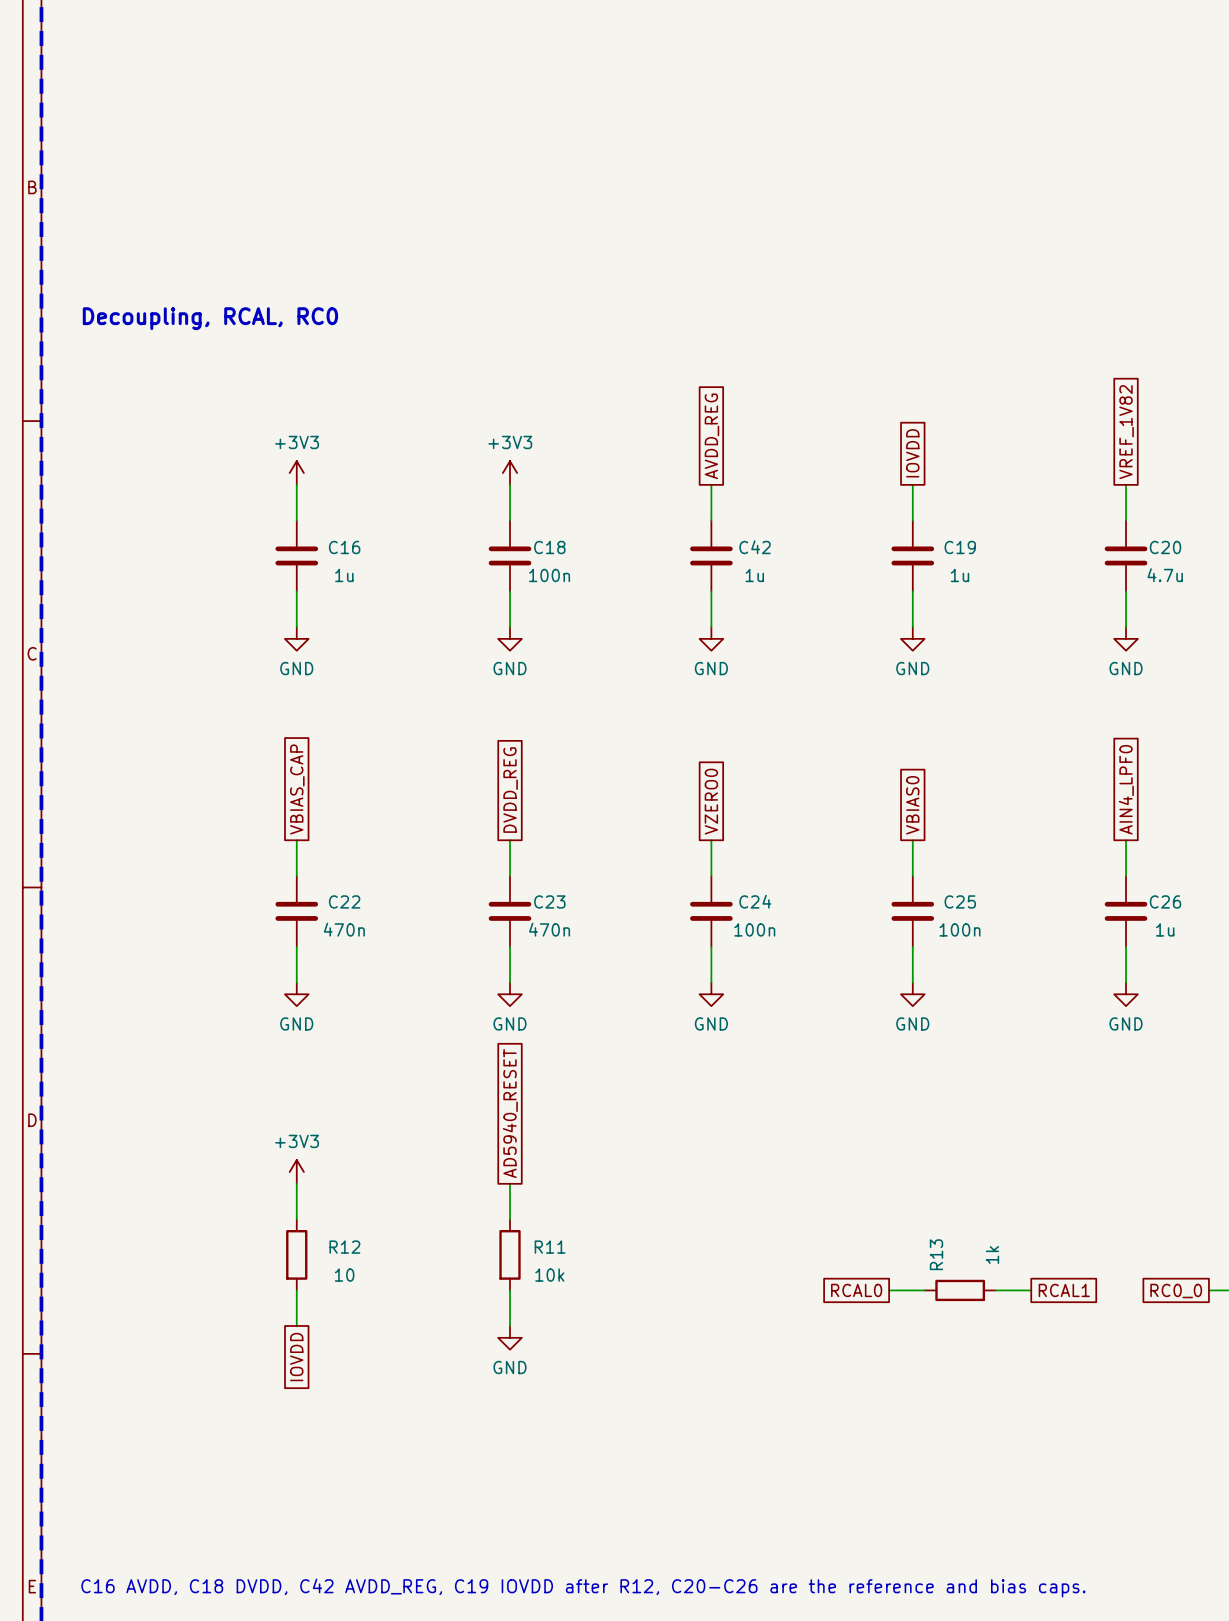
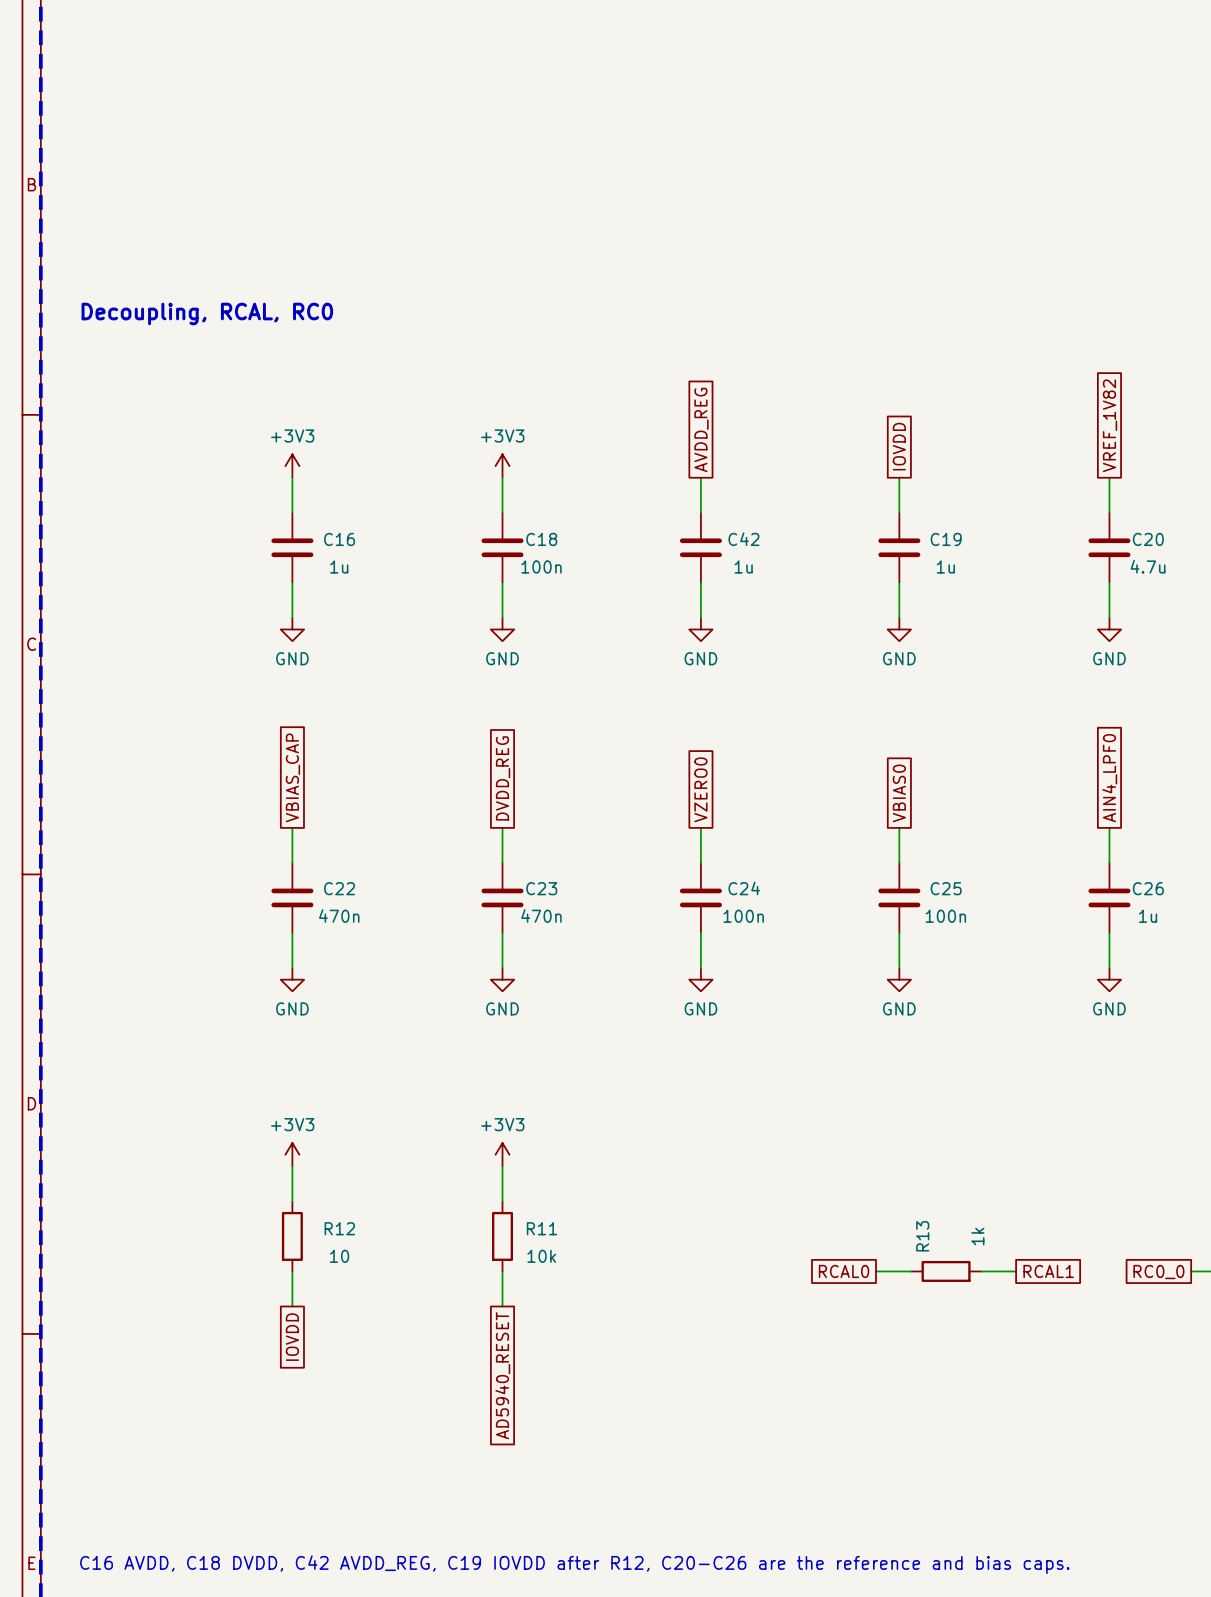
global label rotation: 0° (510, 1113) -> 180° (502, 1375)
global label position: AD5940_RESET (510, 1113) -> AD5940_RESET (502, 1375)
power symbol: none -> +3V3 (502, 1154)
power symbol: GND (510, 1337) -> none

